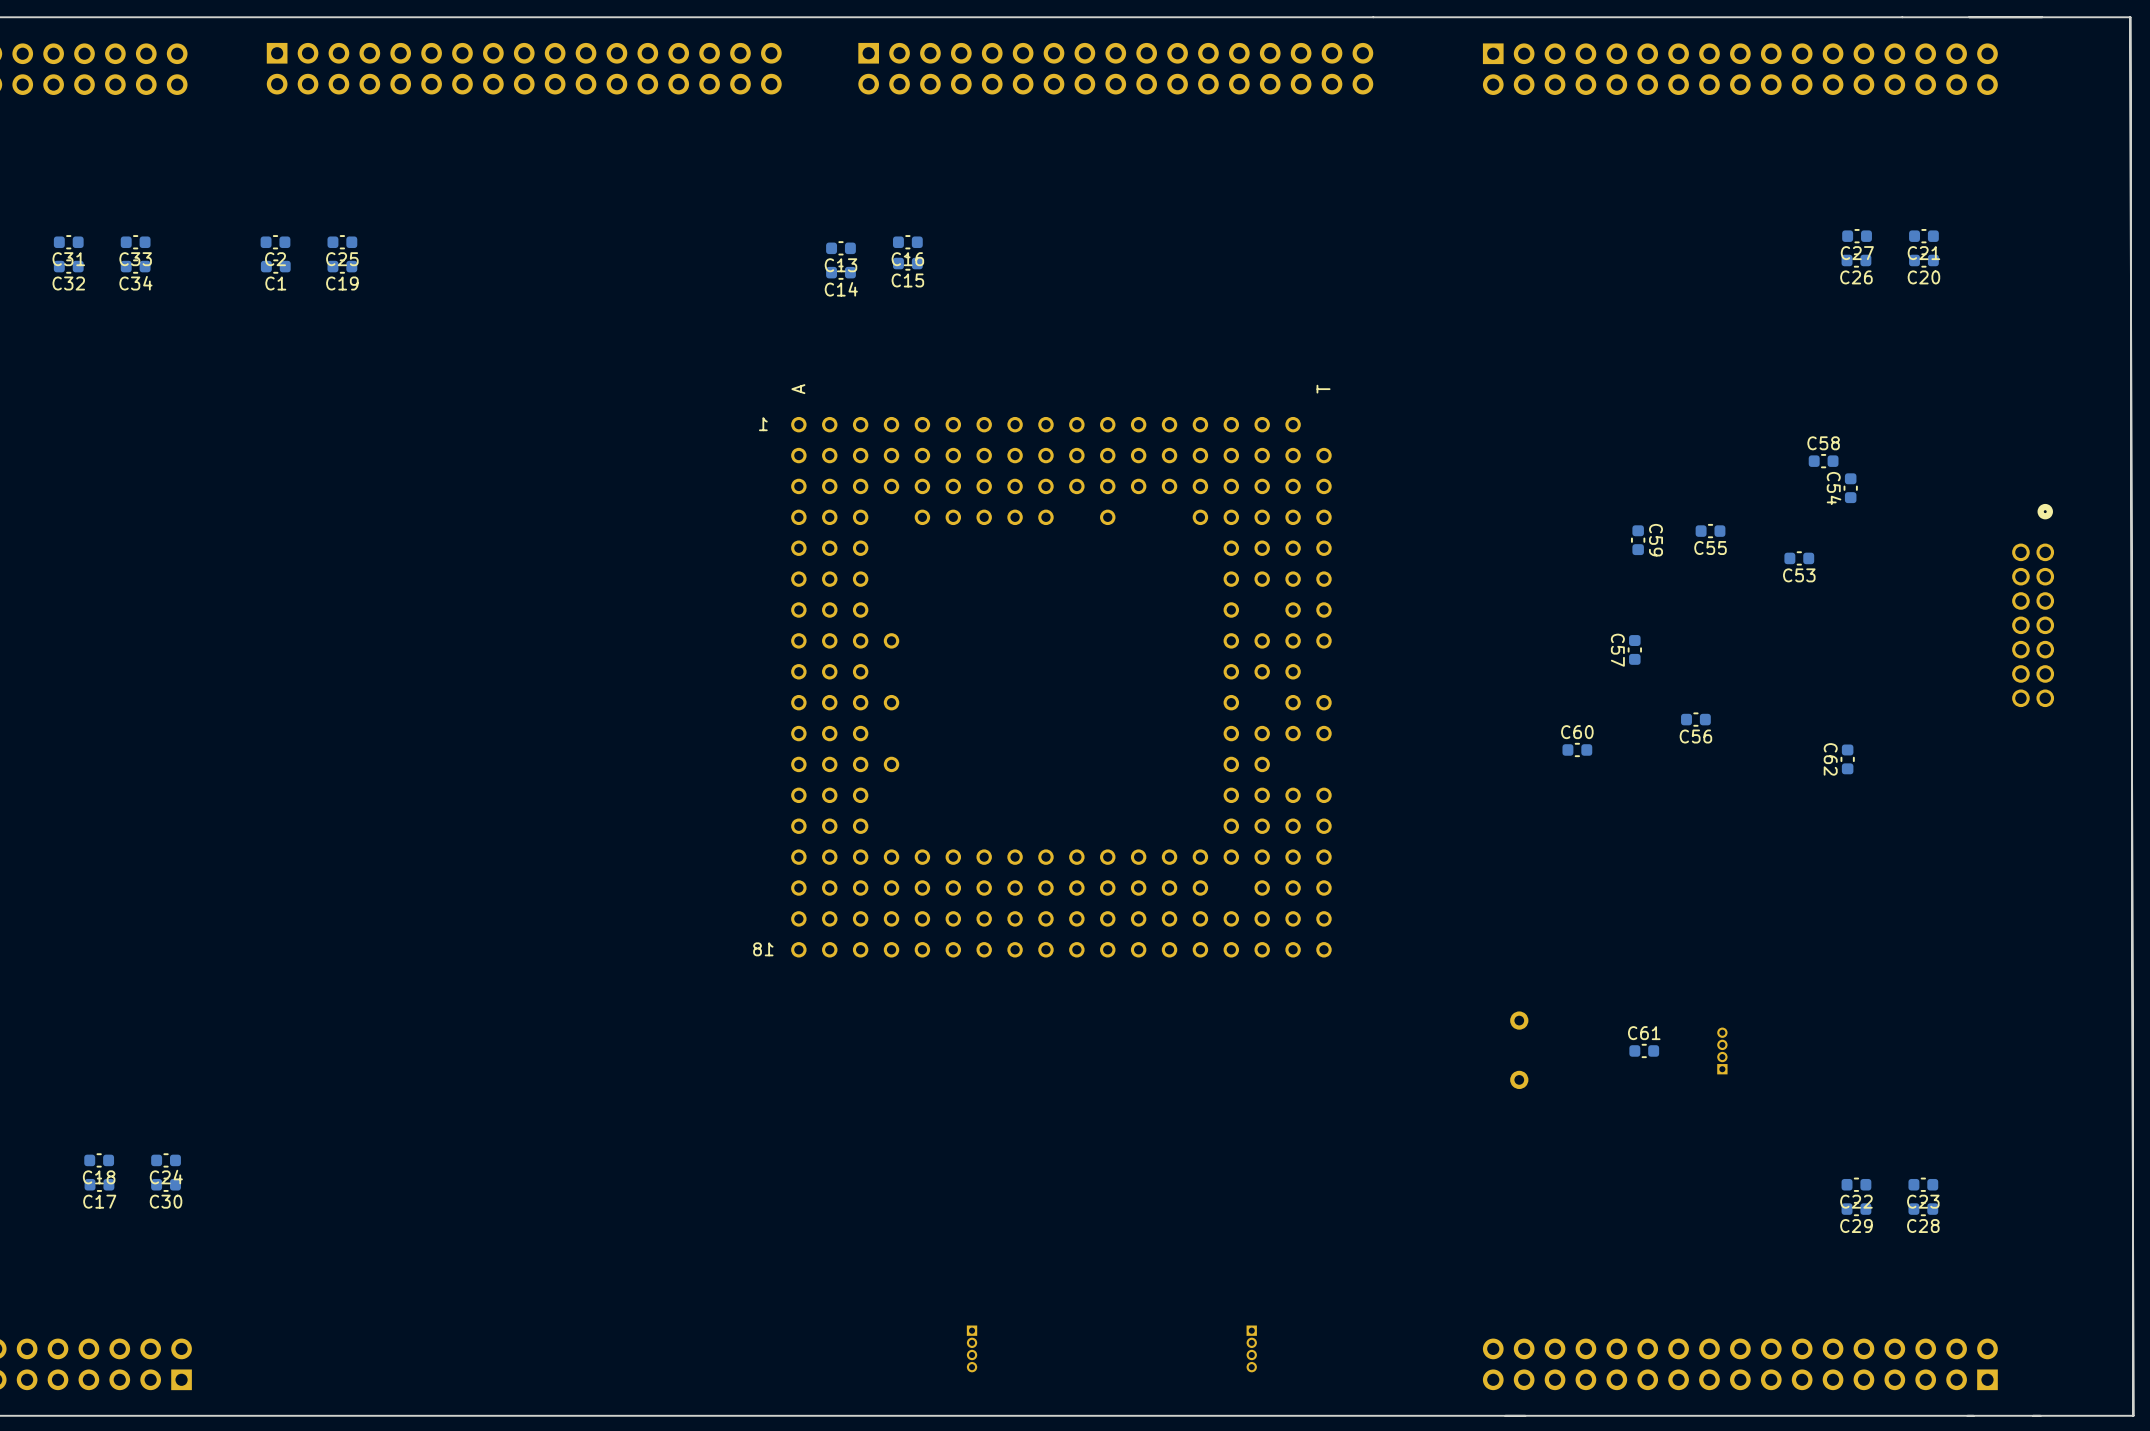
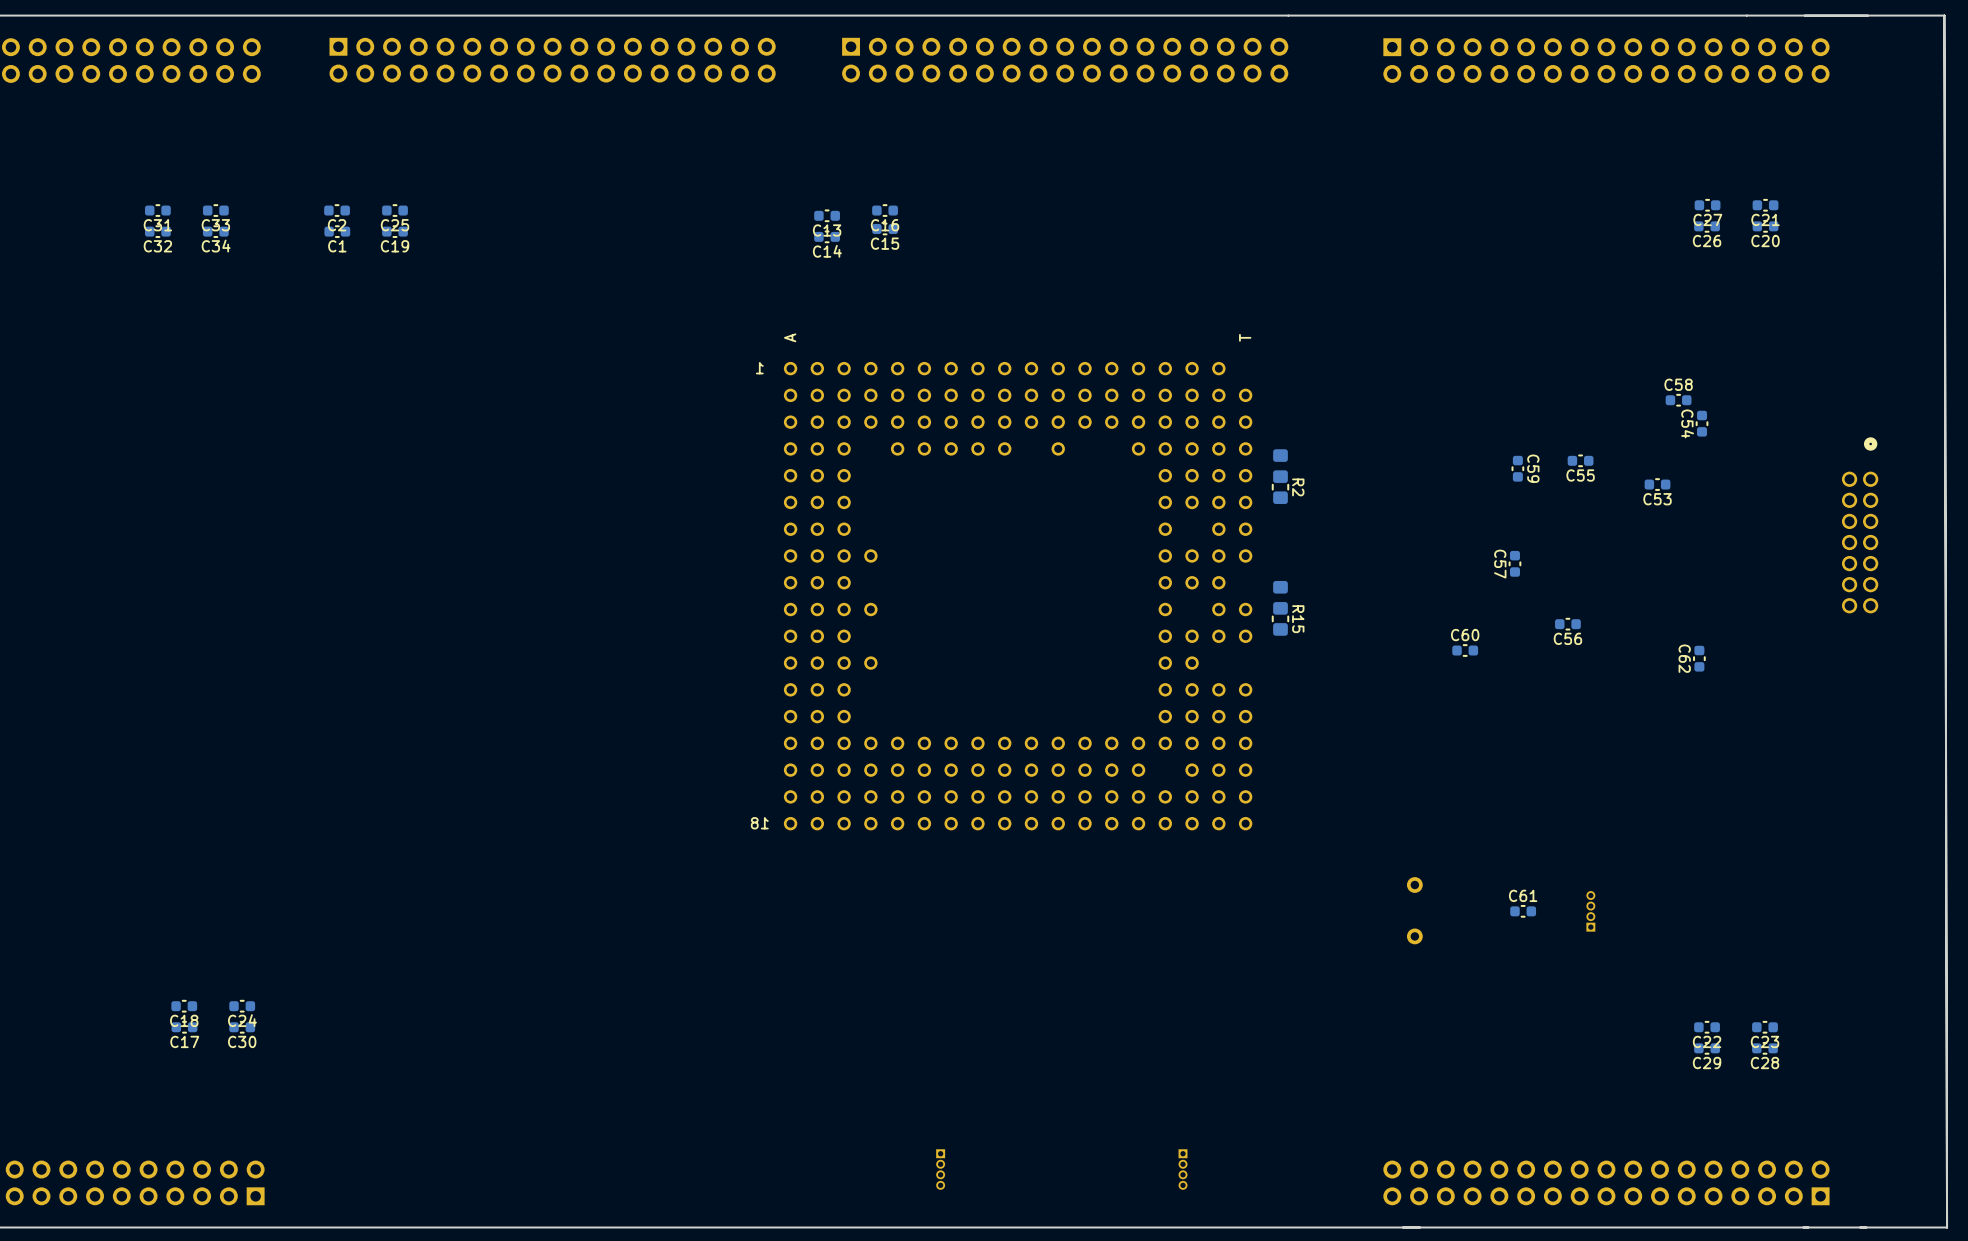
part: none -> (1280, 455)
R2: none -> (1280, 487)
part: none -> (1280, 587)
R15: none -> (1280, 618)

